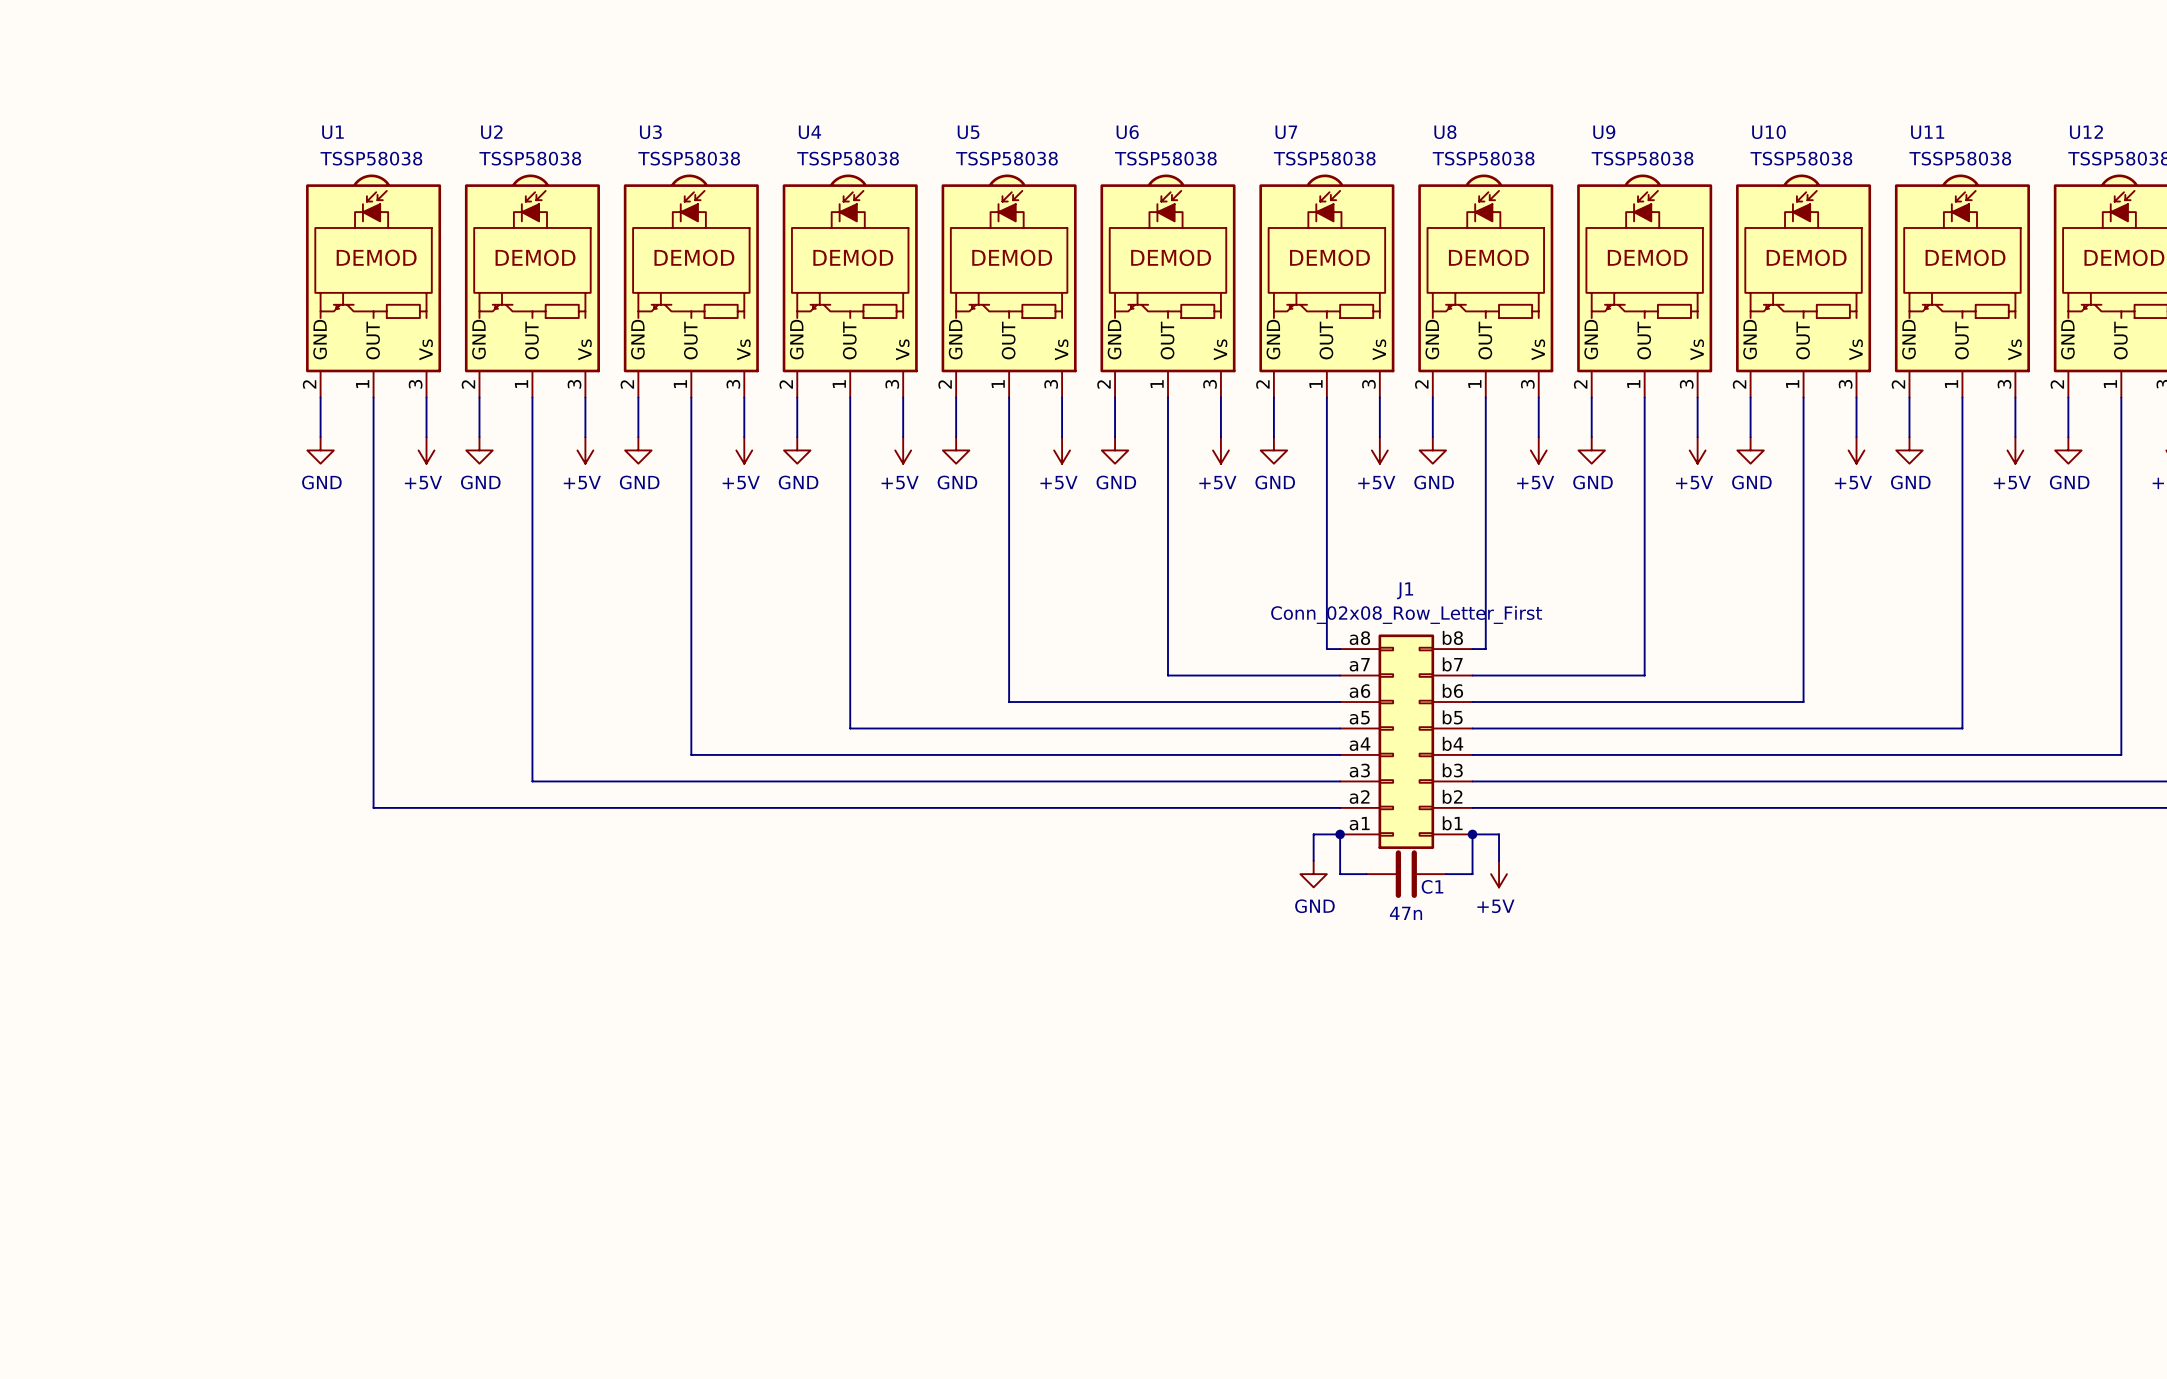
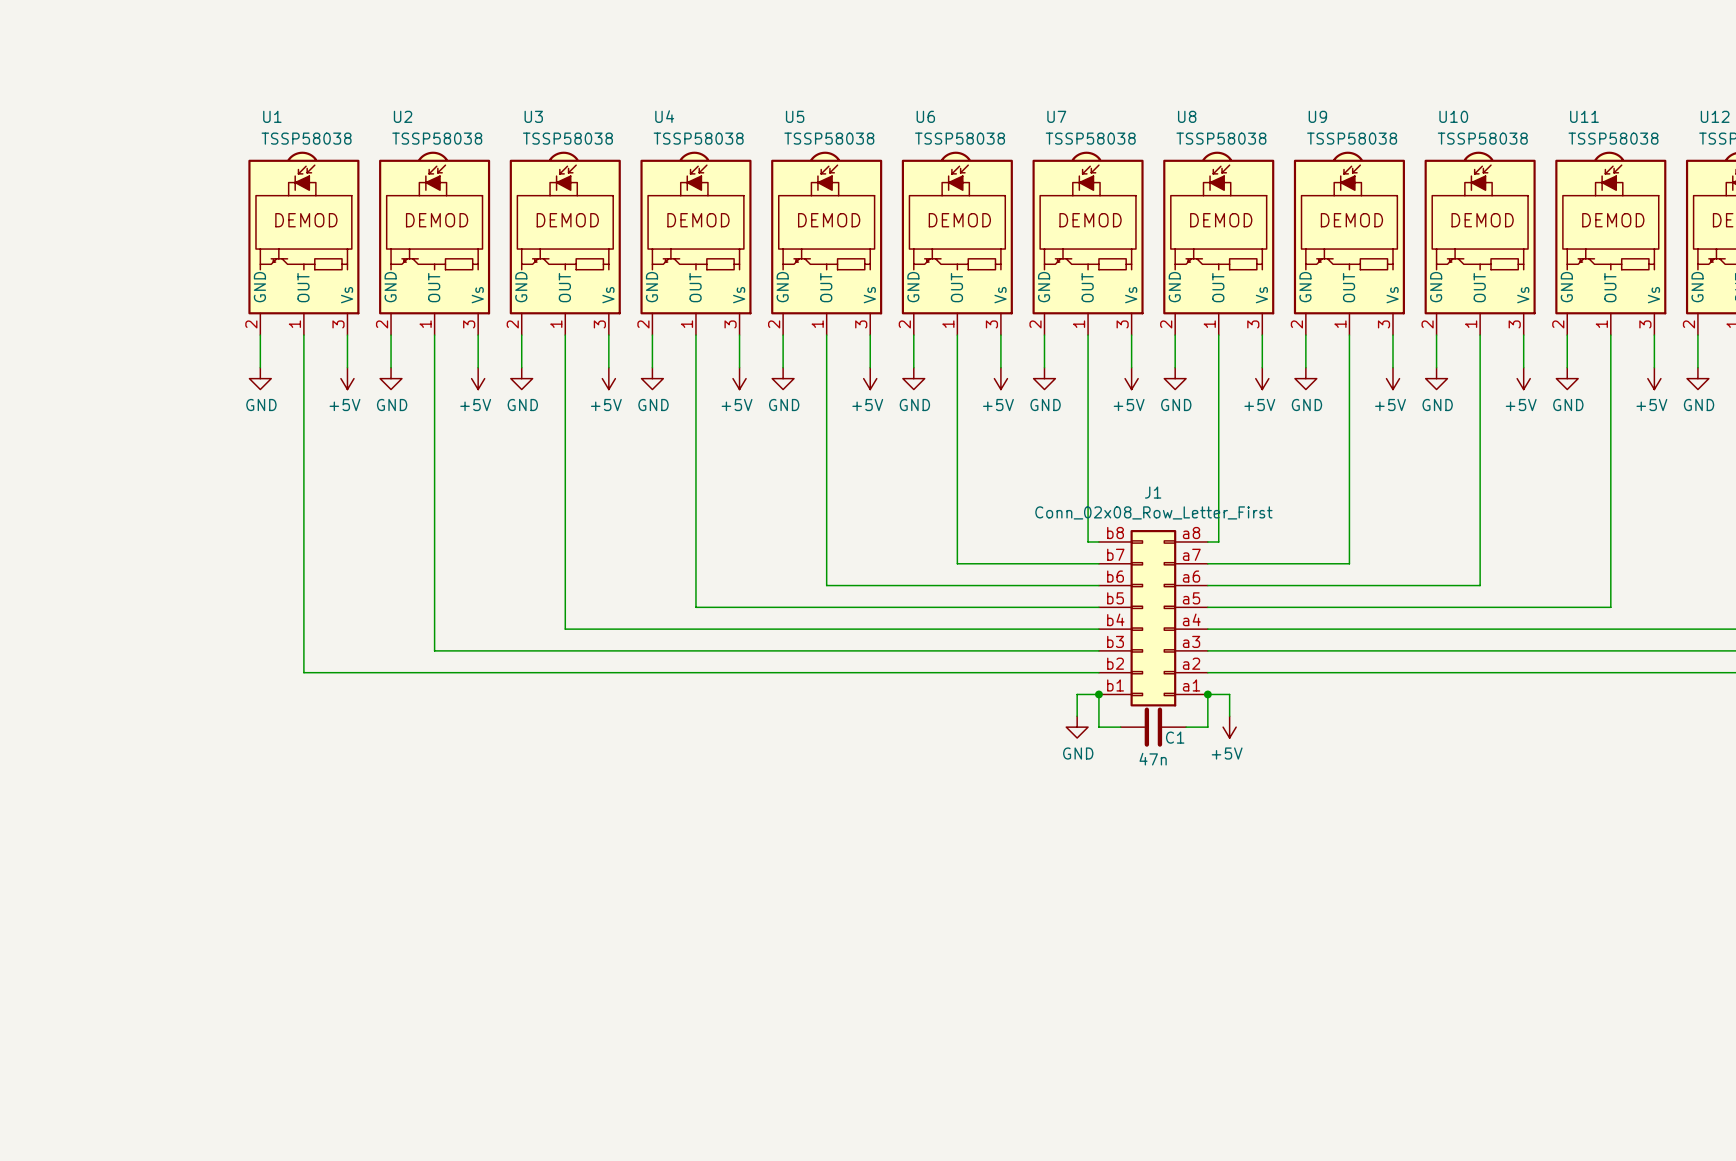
J1 flip: as is (1406, 741) -> left-right (1153, 618)

